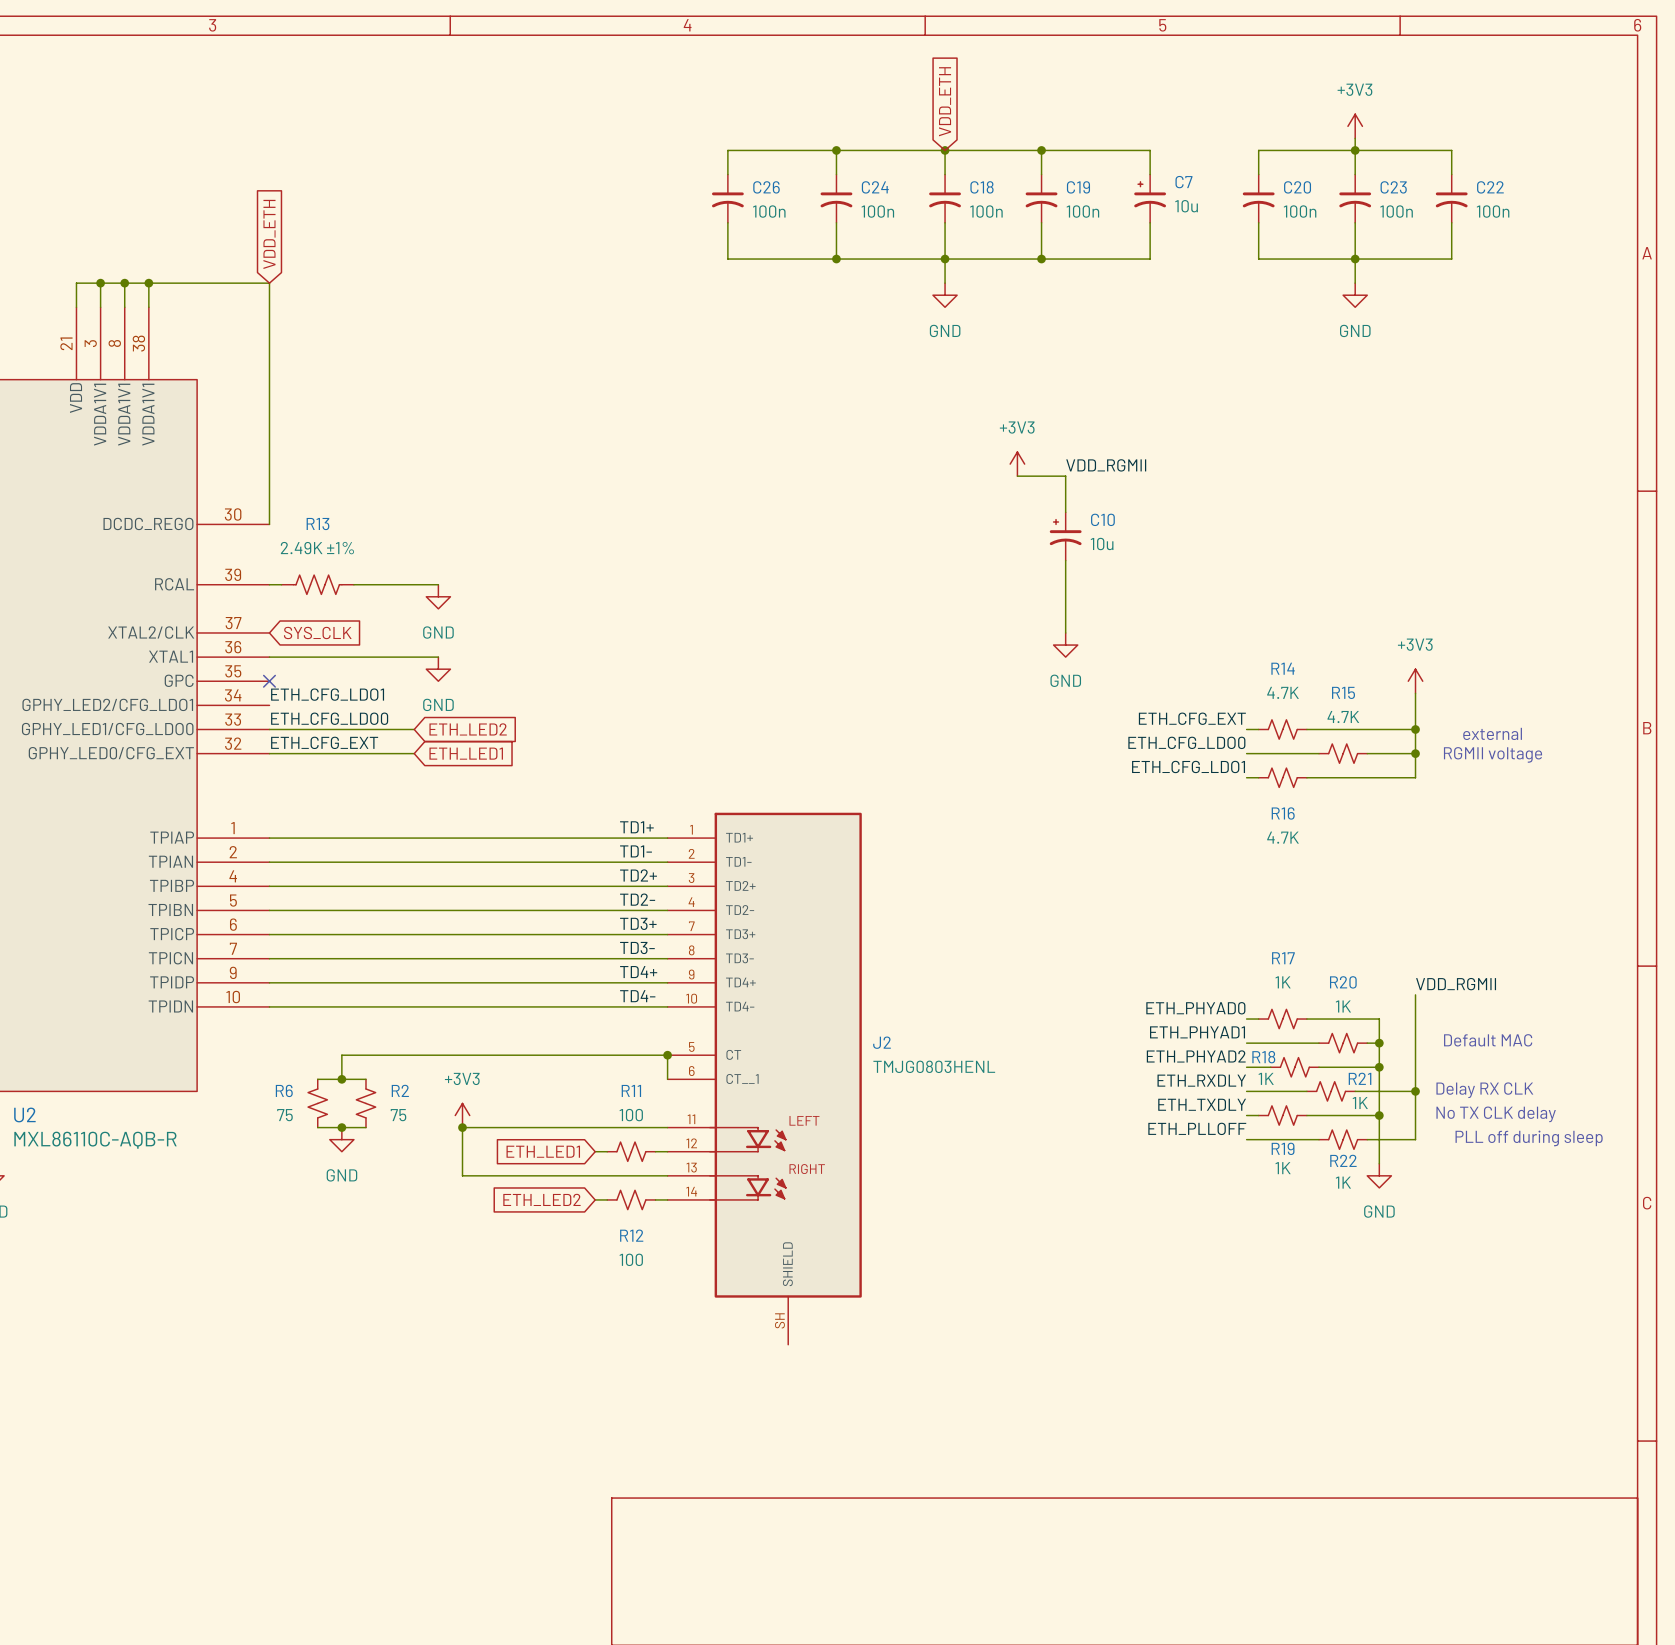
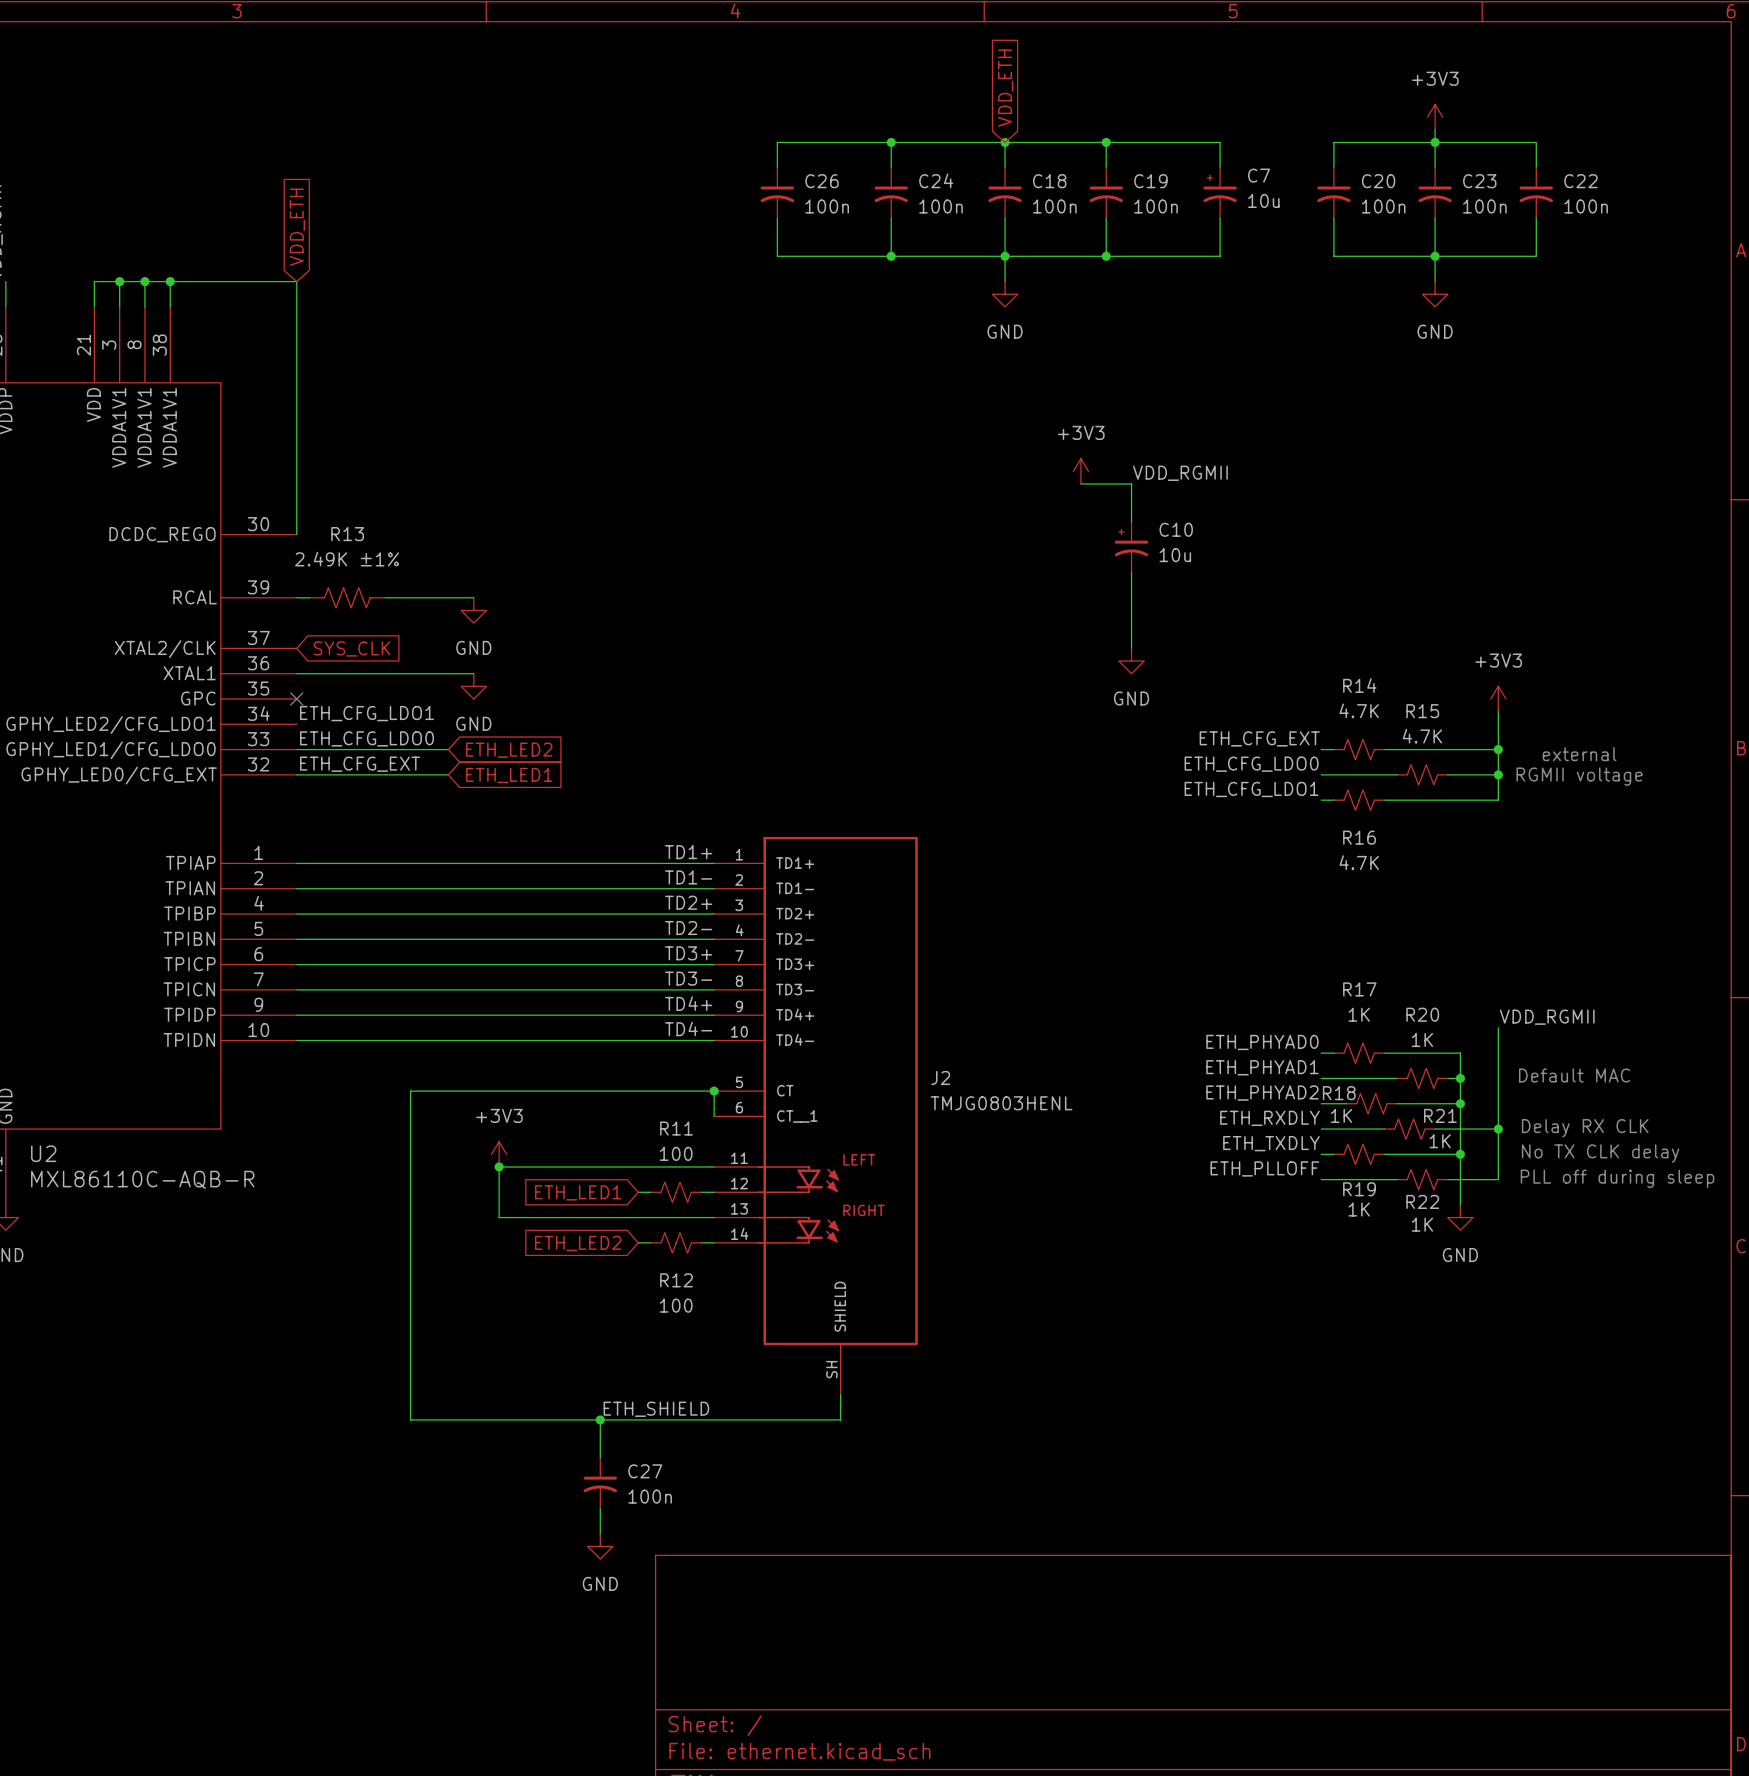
wire: (378, 1055) (341, 1055) (341, 1079) -> (410, 1091) (410, 1419) (840, 1419) (840, 1394)
wire: (317, 1079) (365, 1079) -> none
junction: (341, 1079) -> none
R6: 75 (317, 1103) -> none
R2: 75 (365, 1103) -> none
wire: (317, 1127) (365, 1127) -> none
junction: (341, 1127) -> none
power symbol: GND (341, 1139) -> none
label: none -> ETH_SHIELD (656, 1409)
wire: none -> (600, 1419) (600, 1457)
junction: none -> (600, 1419)
C27: none -> 100n (600, 1483)
wire: none -> (600, 1508) (600, 1533)
power symbol: none -> GND (600, 1546)

